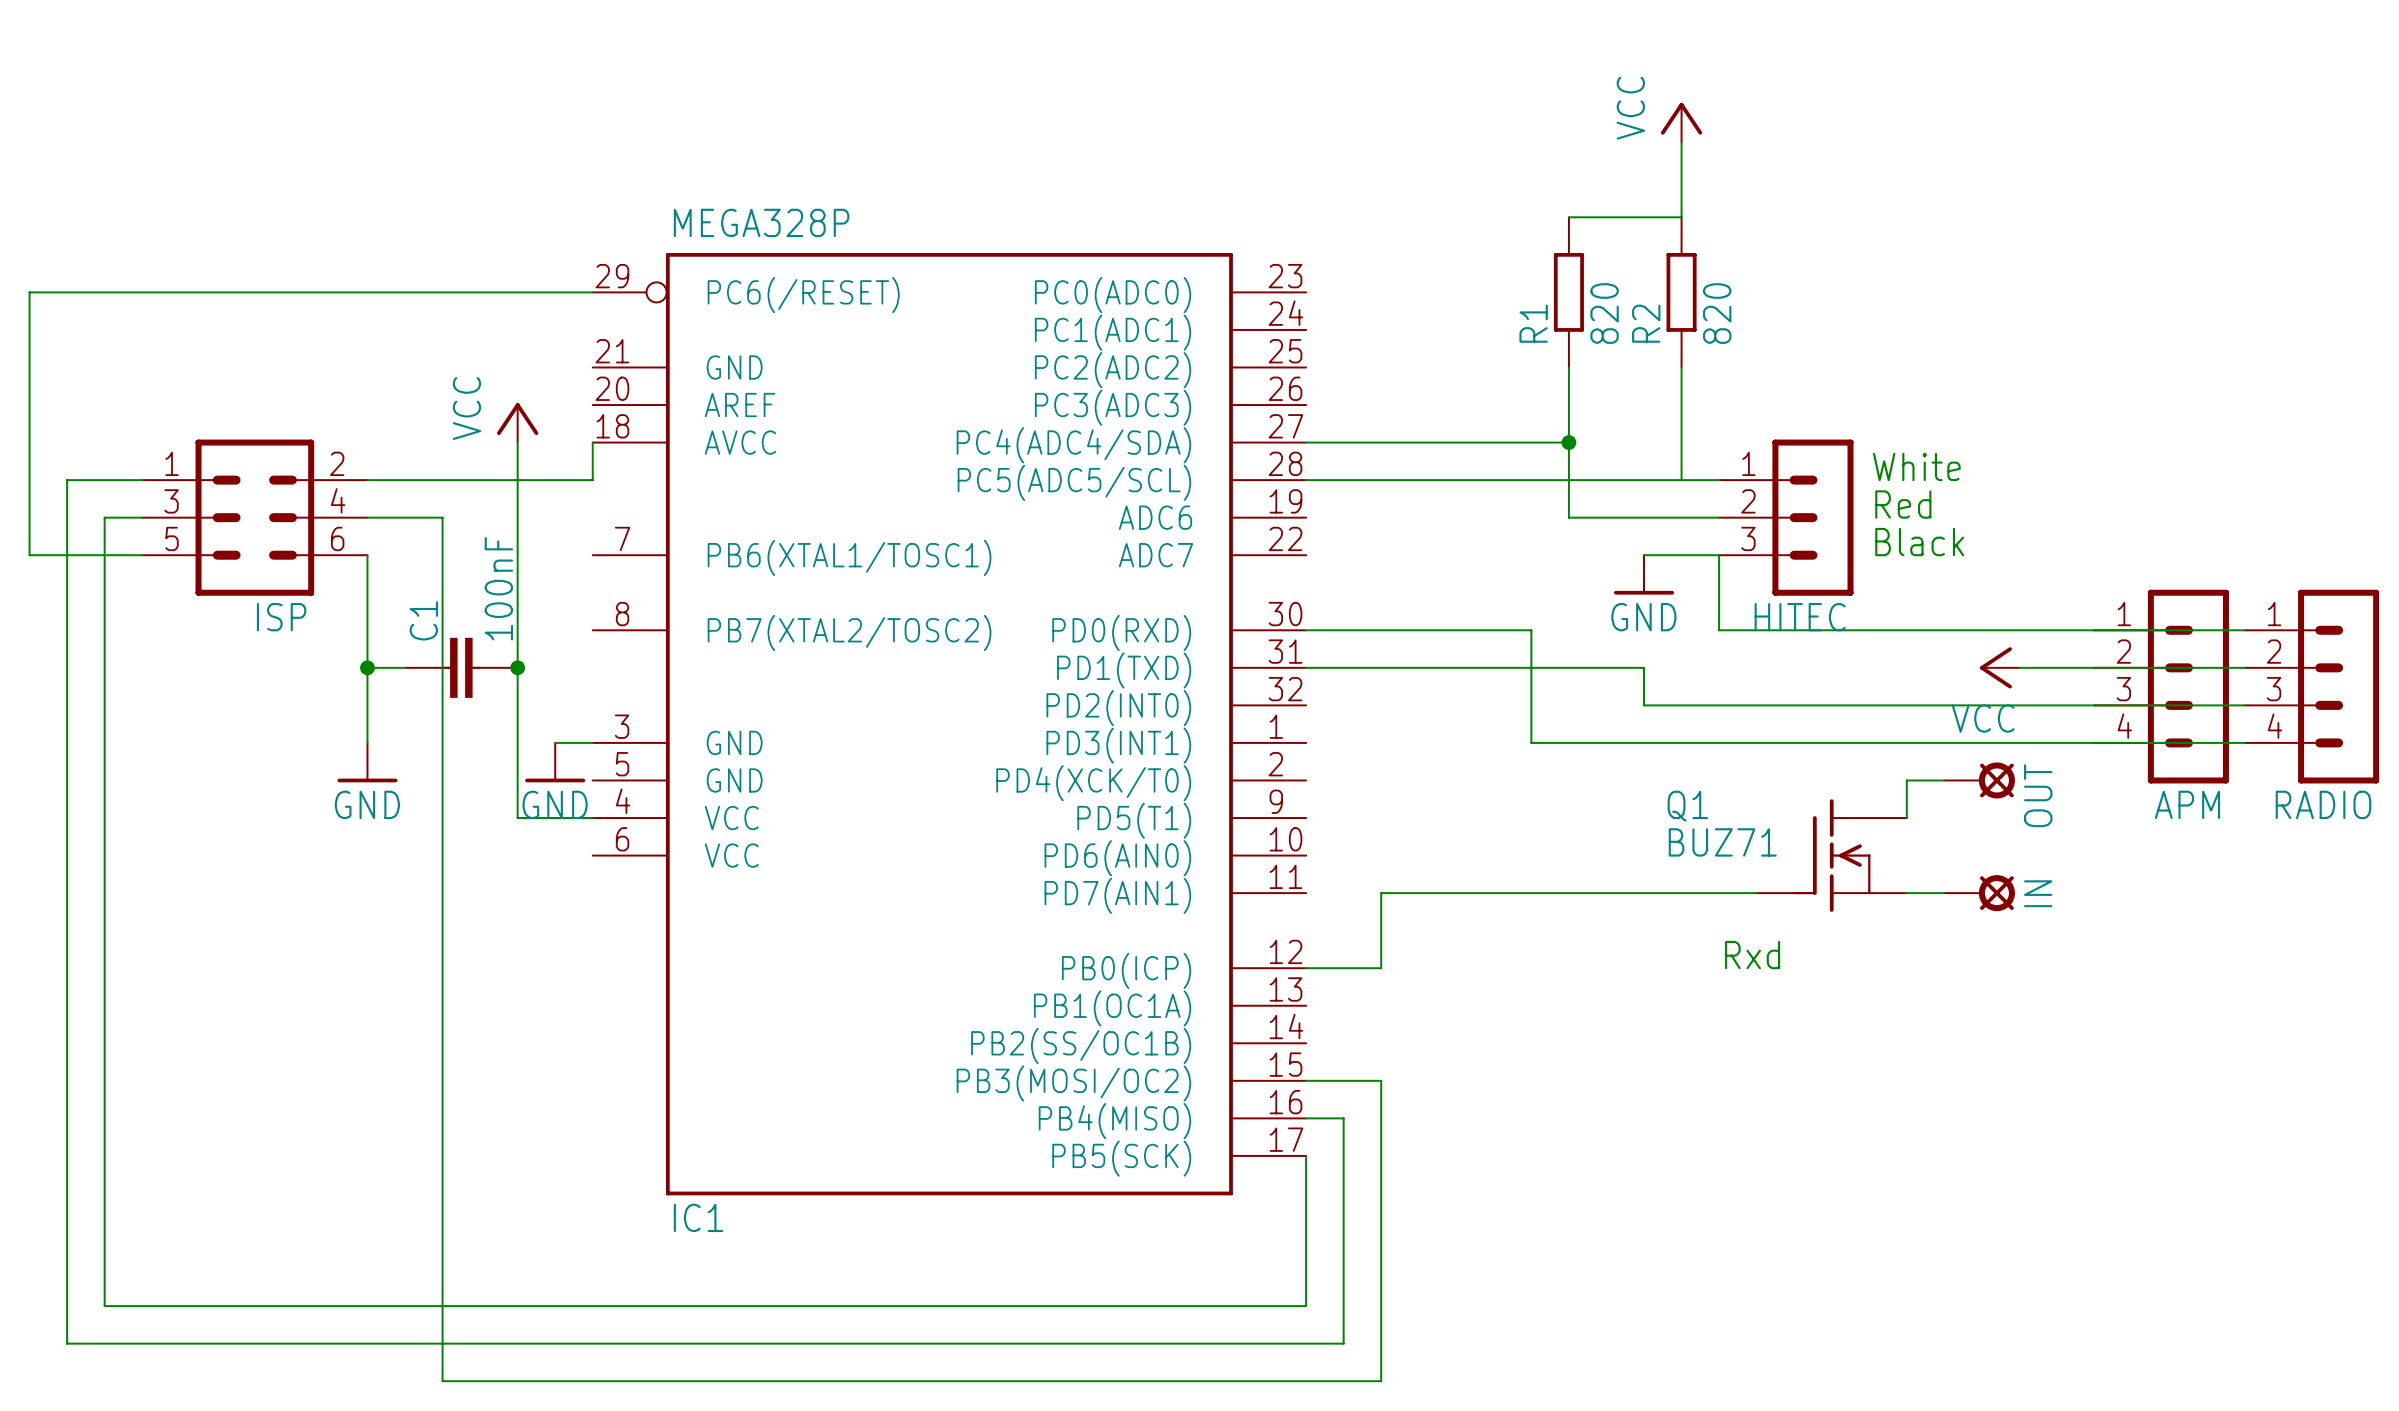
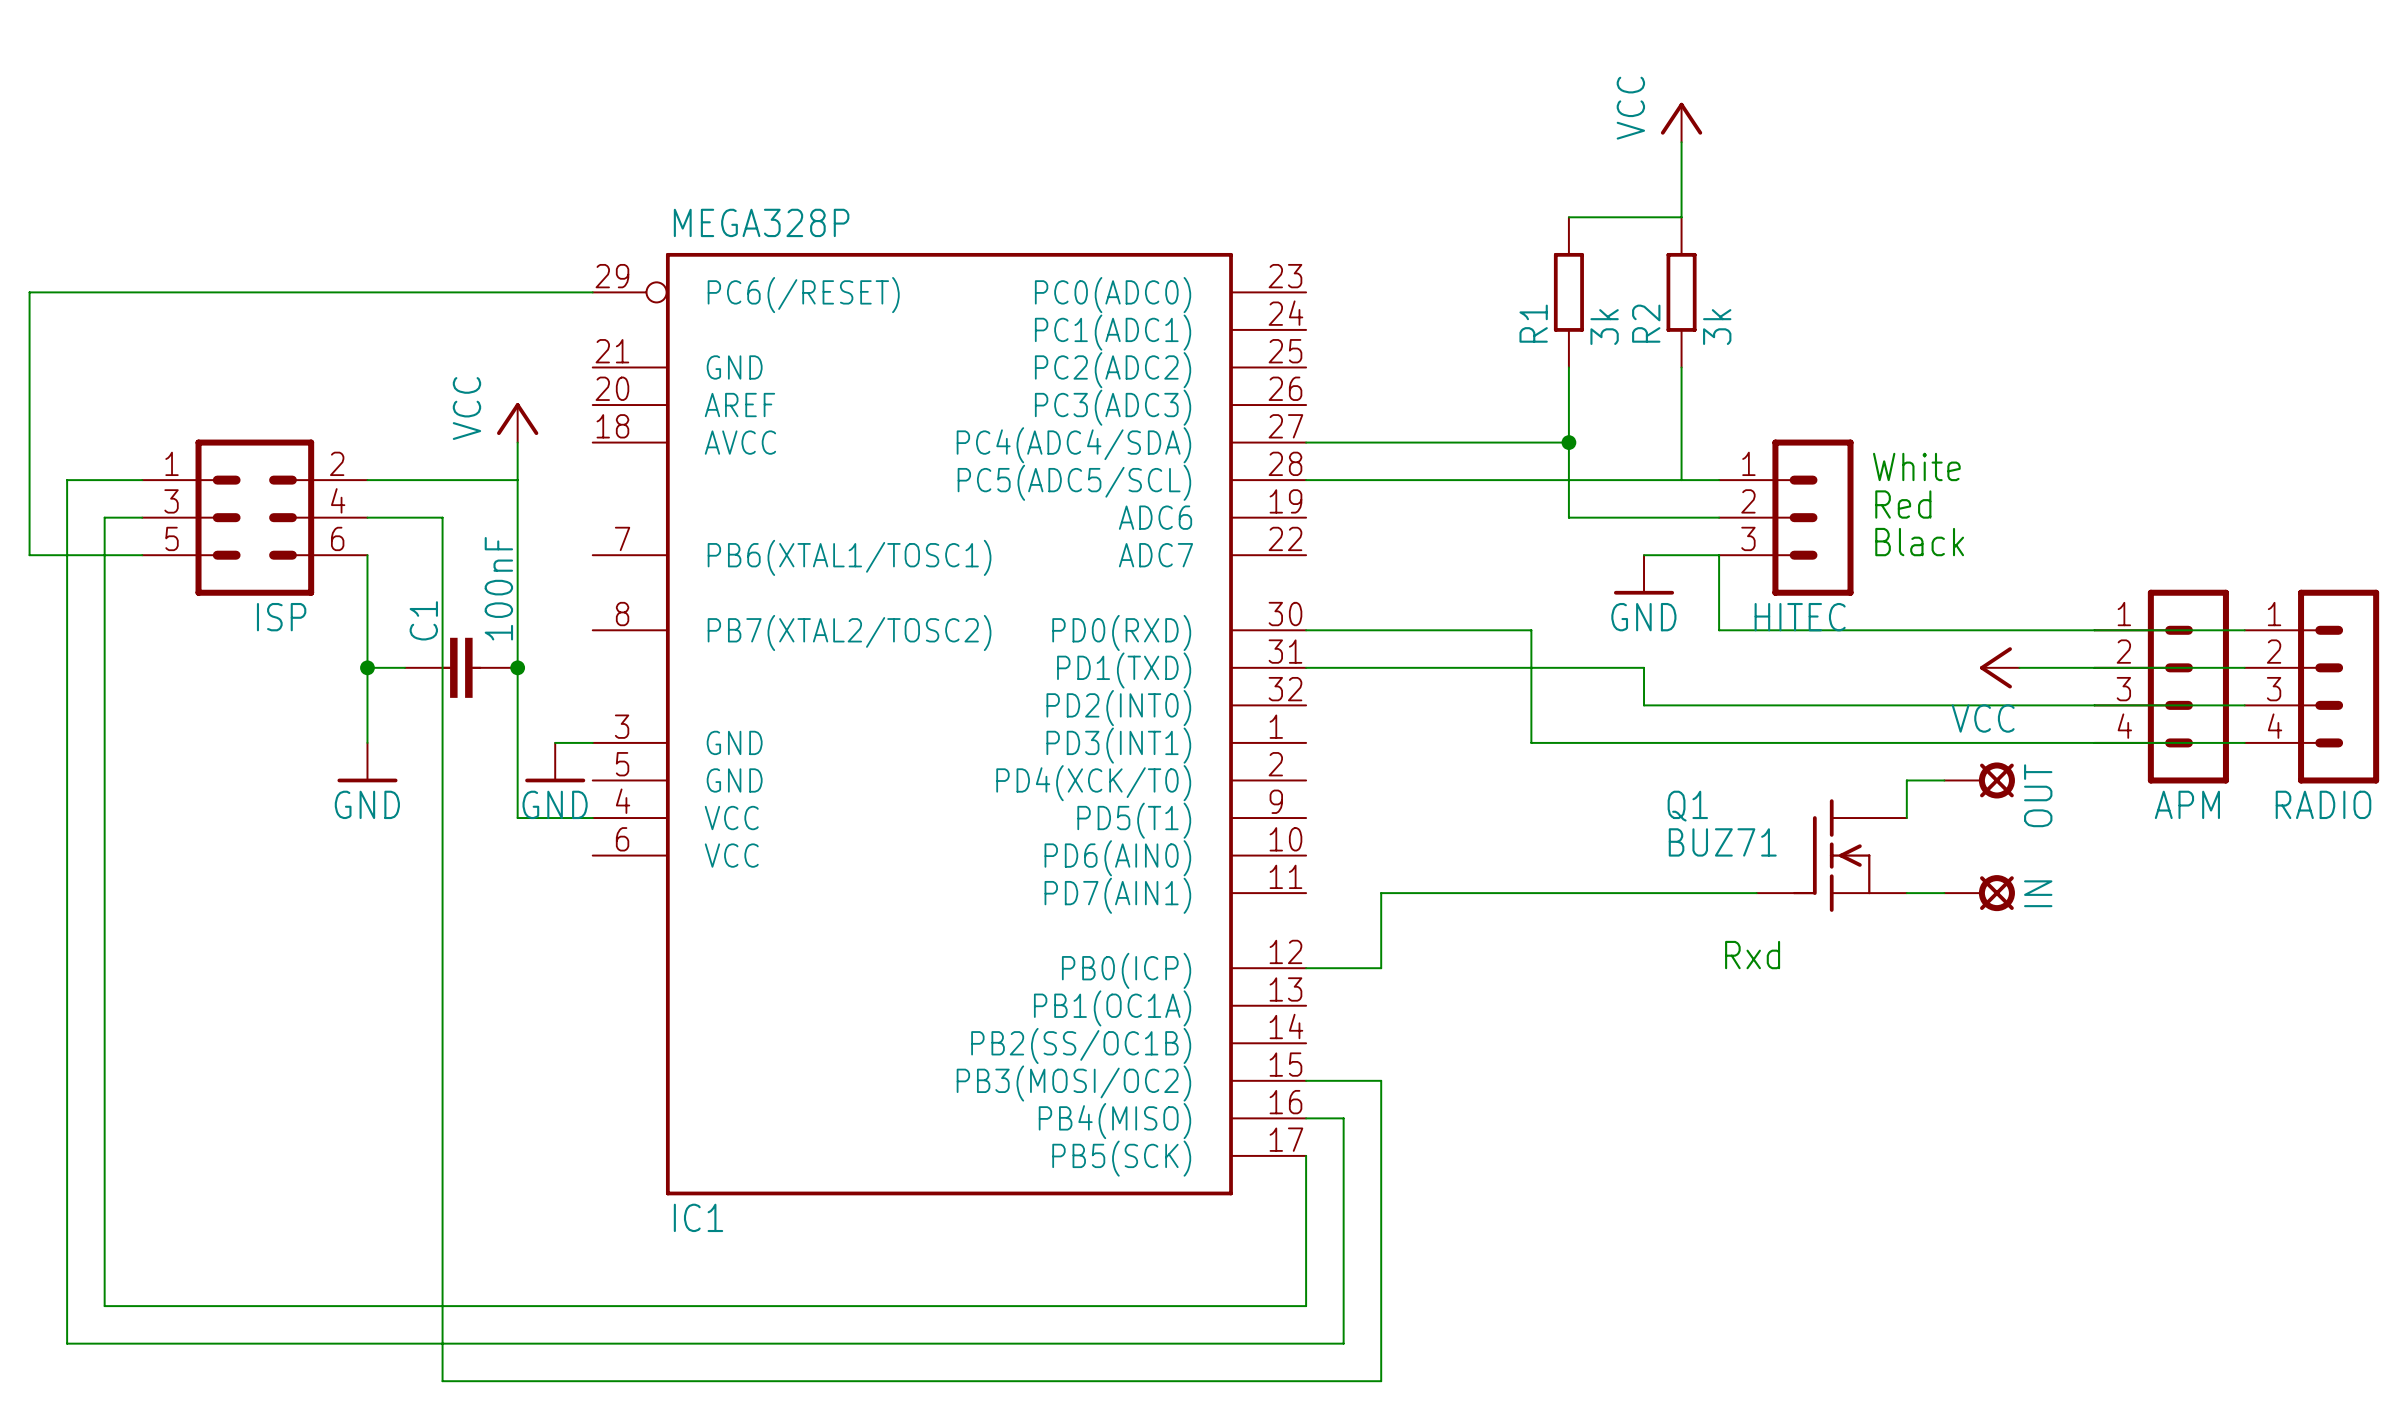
R1 value: 820 (1604, 313) -> 3k (1604, 327)
R2 value: 820 (1717, 313) -> 3k (1717, 327)
wire: (592, 442) (592, 480) (517, 480) -> none

